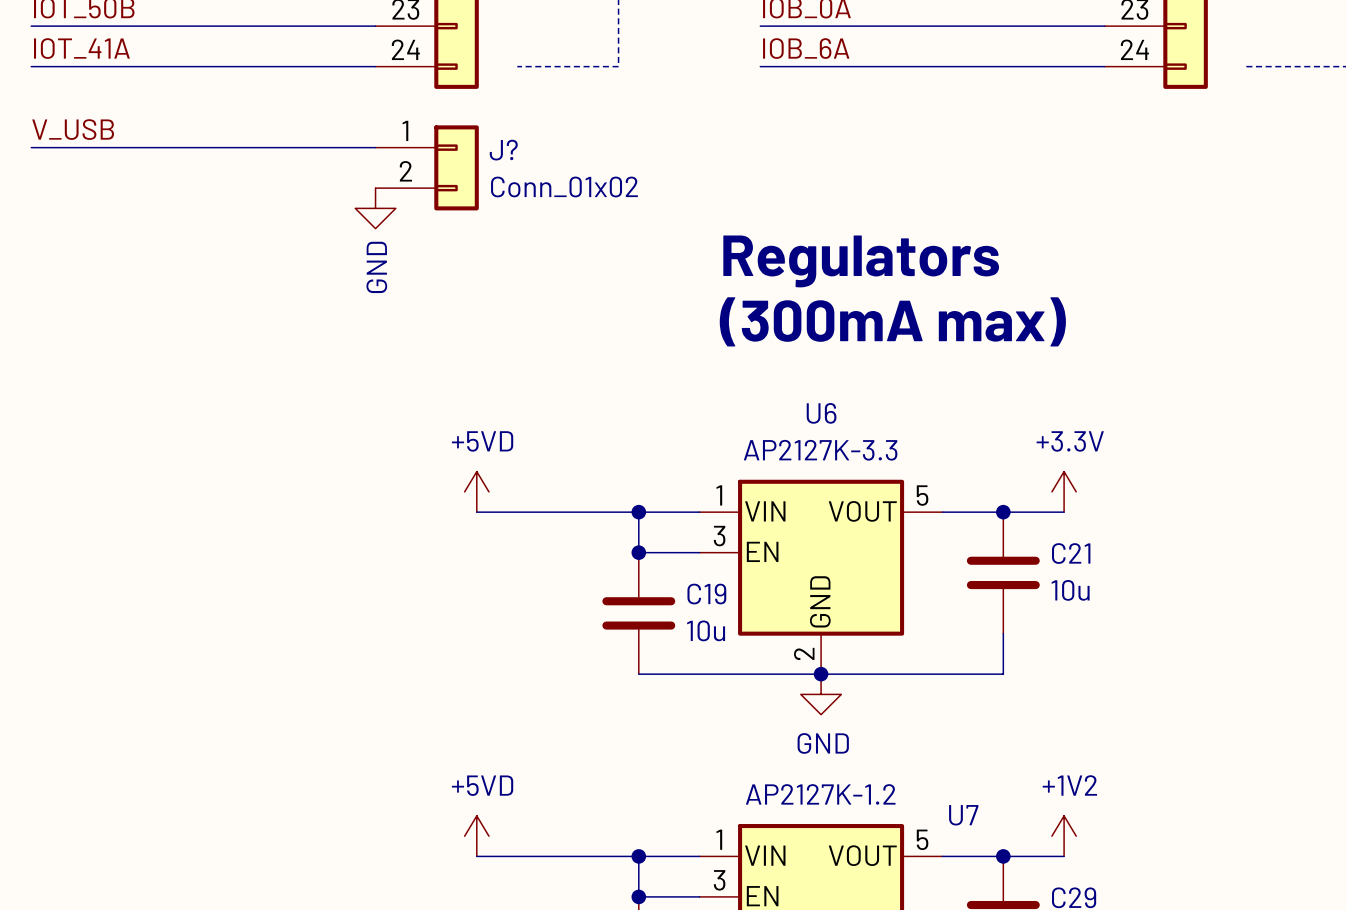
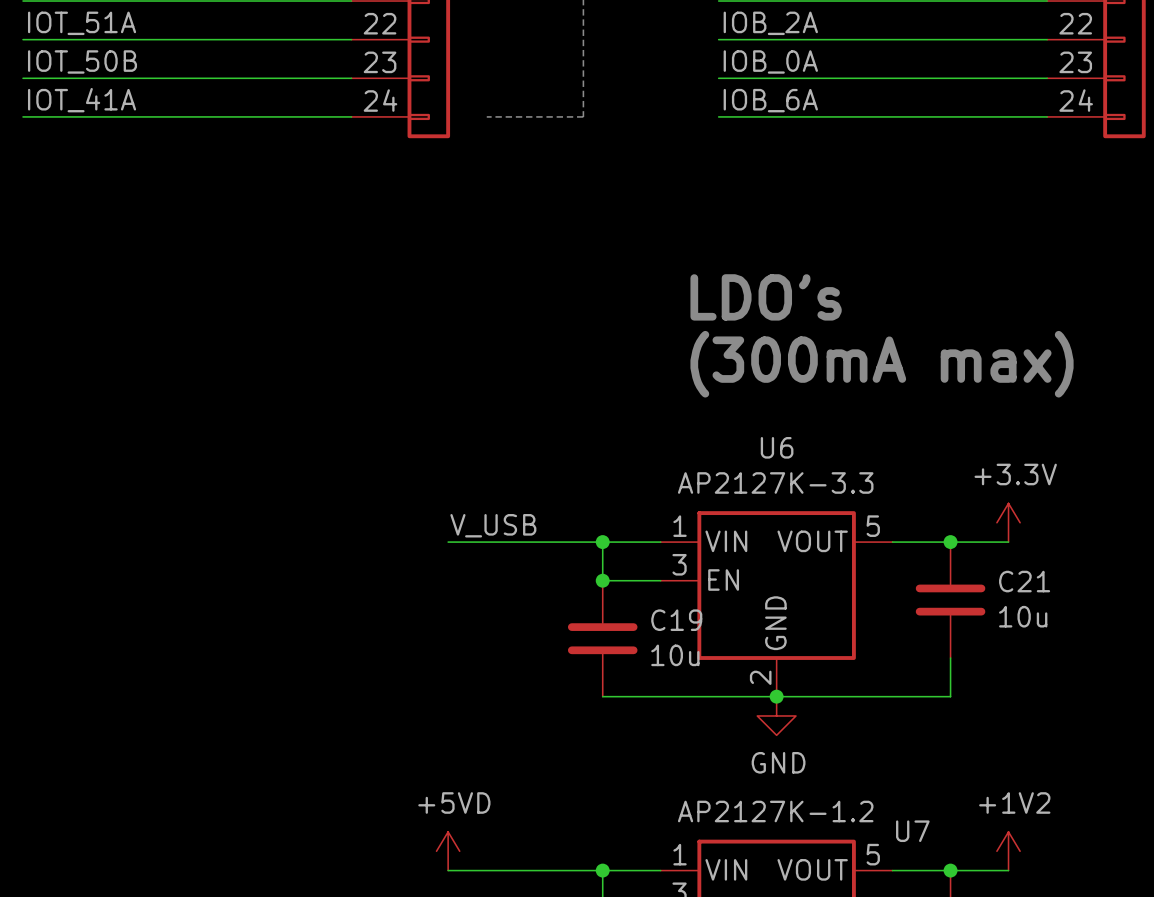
label: V_USB (73, 129) -> none
wire: (31, 147) (375, 147) -> none
J?: Conn_01x02 (427, 167) -> none
power symbol: GND (375, 208) -> none
text: Regulators (861, 261) -> LDO’s (766, 297)
power symbol: +5VD (476, 491) -> none
label: none -> V_USB (493, 525)

